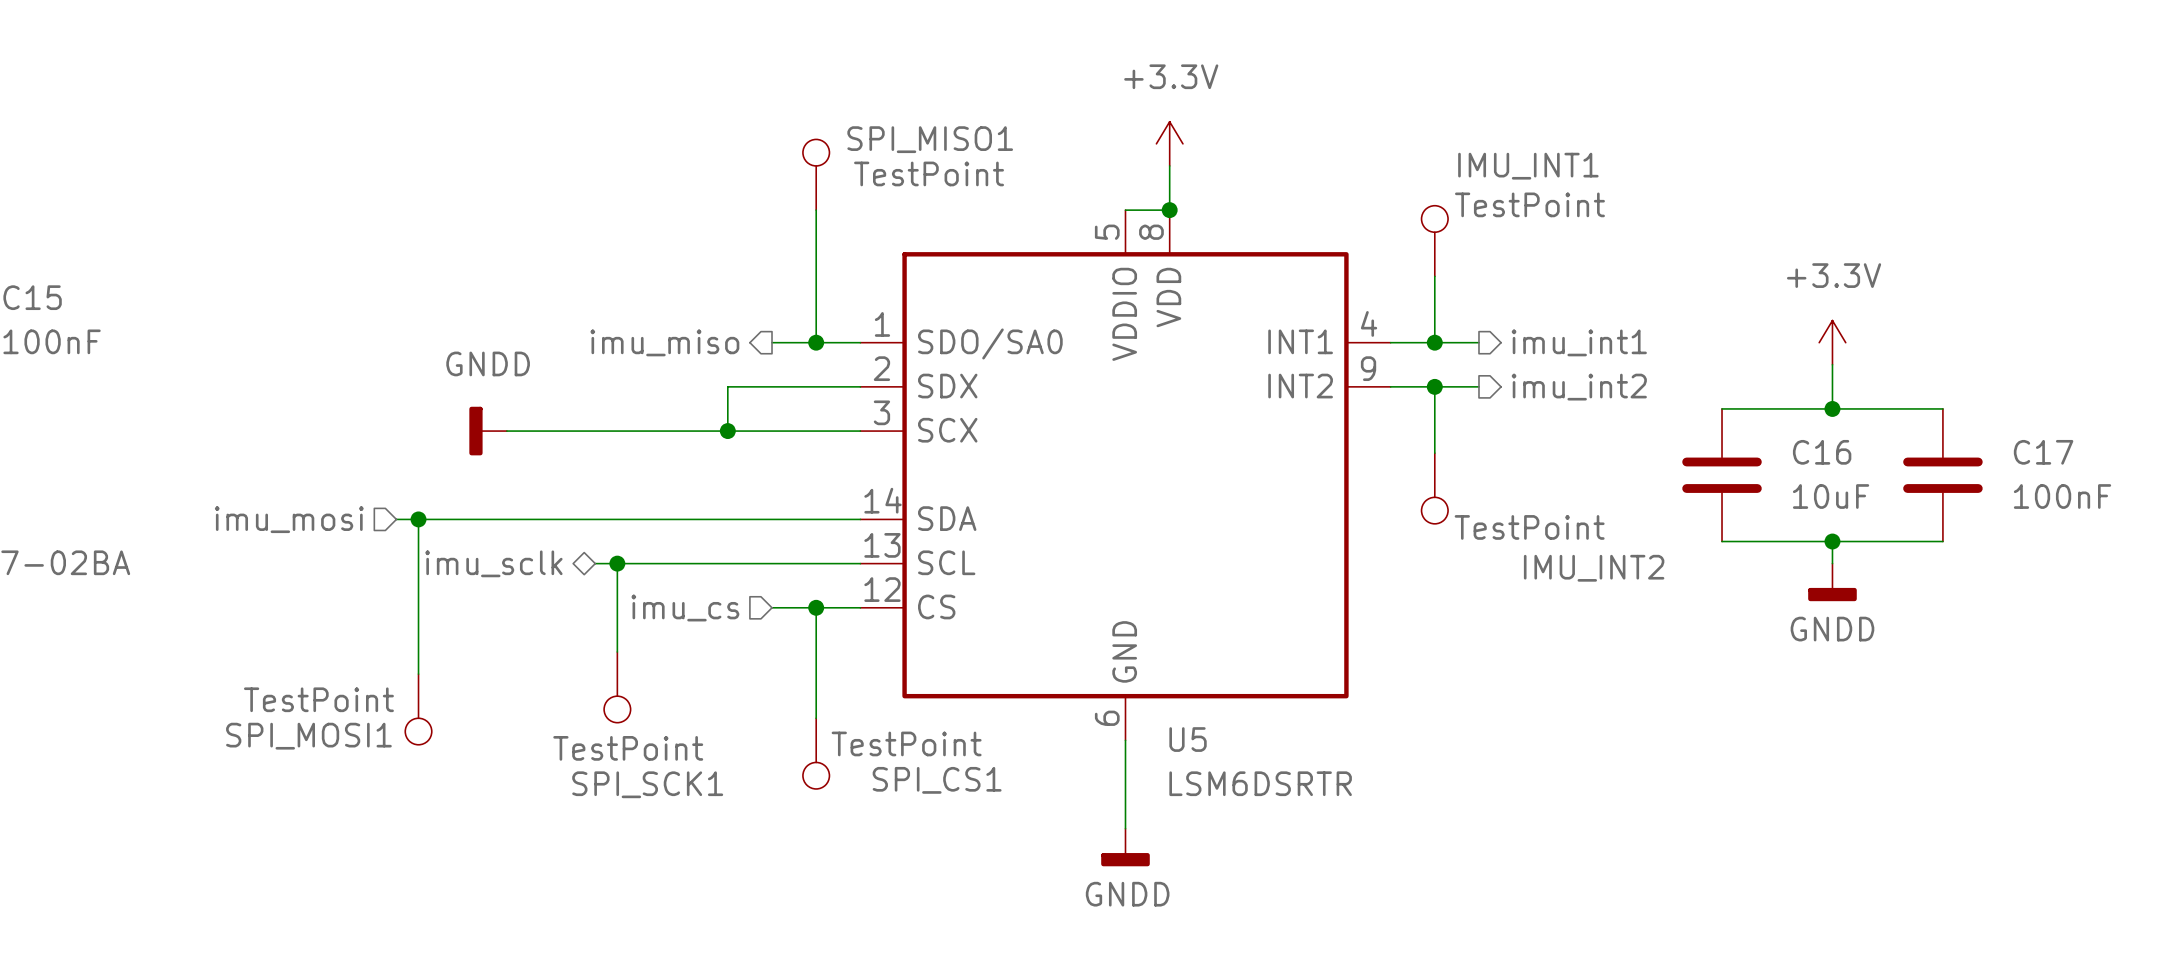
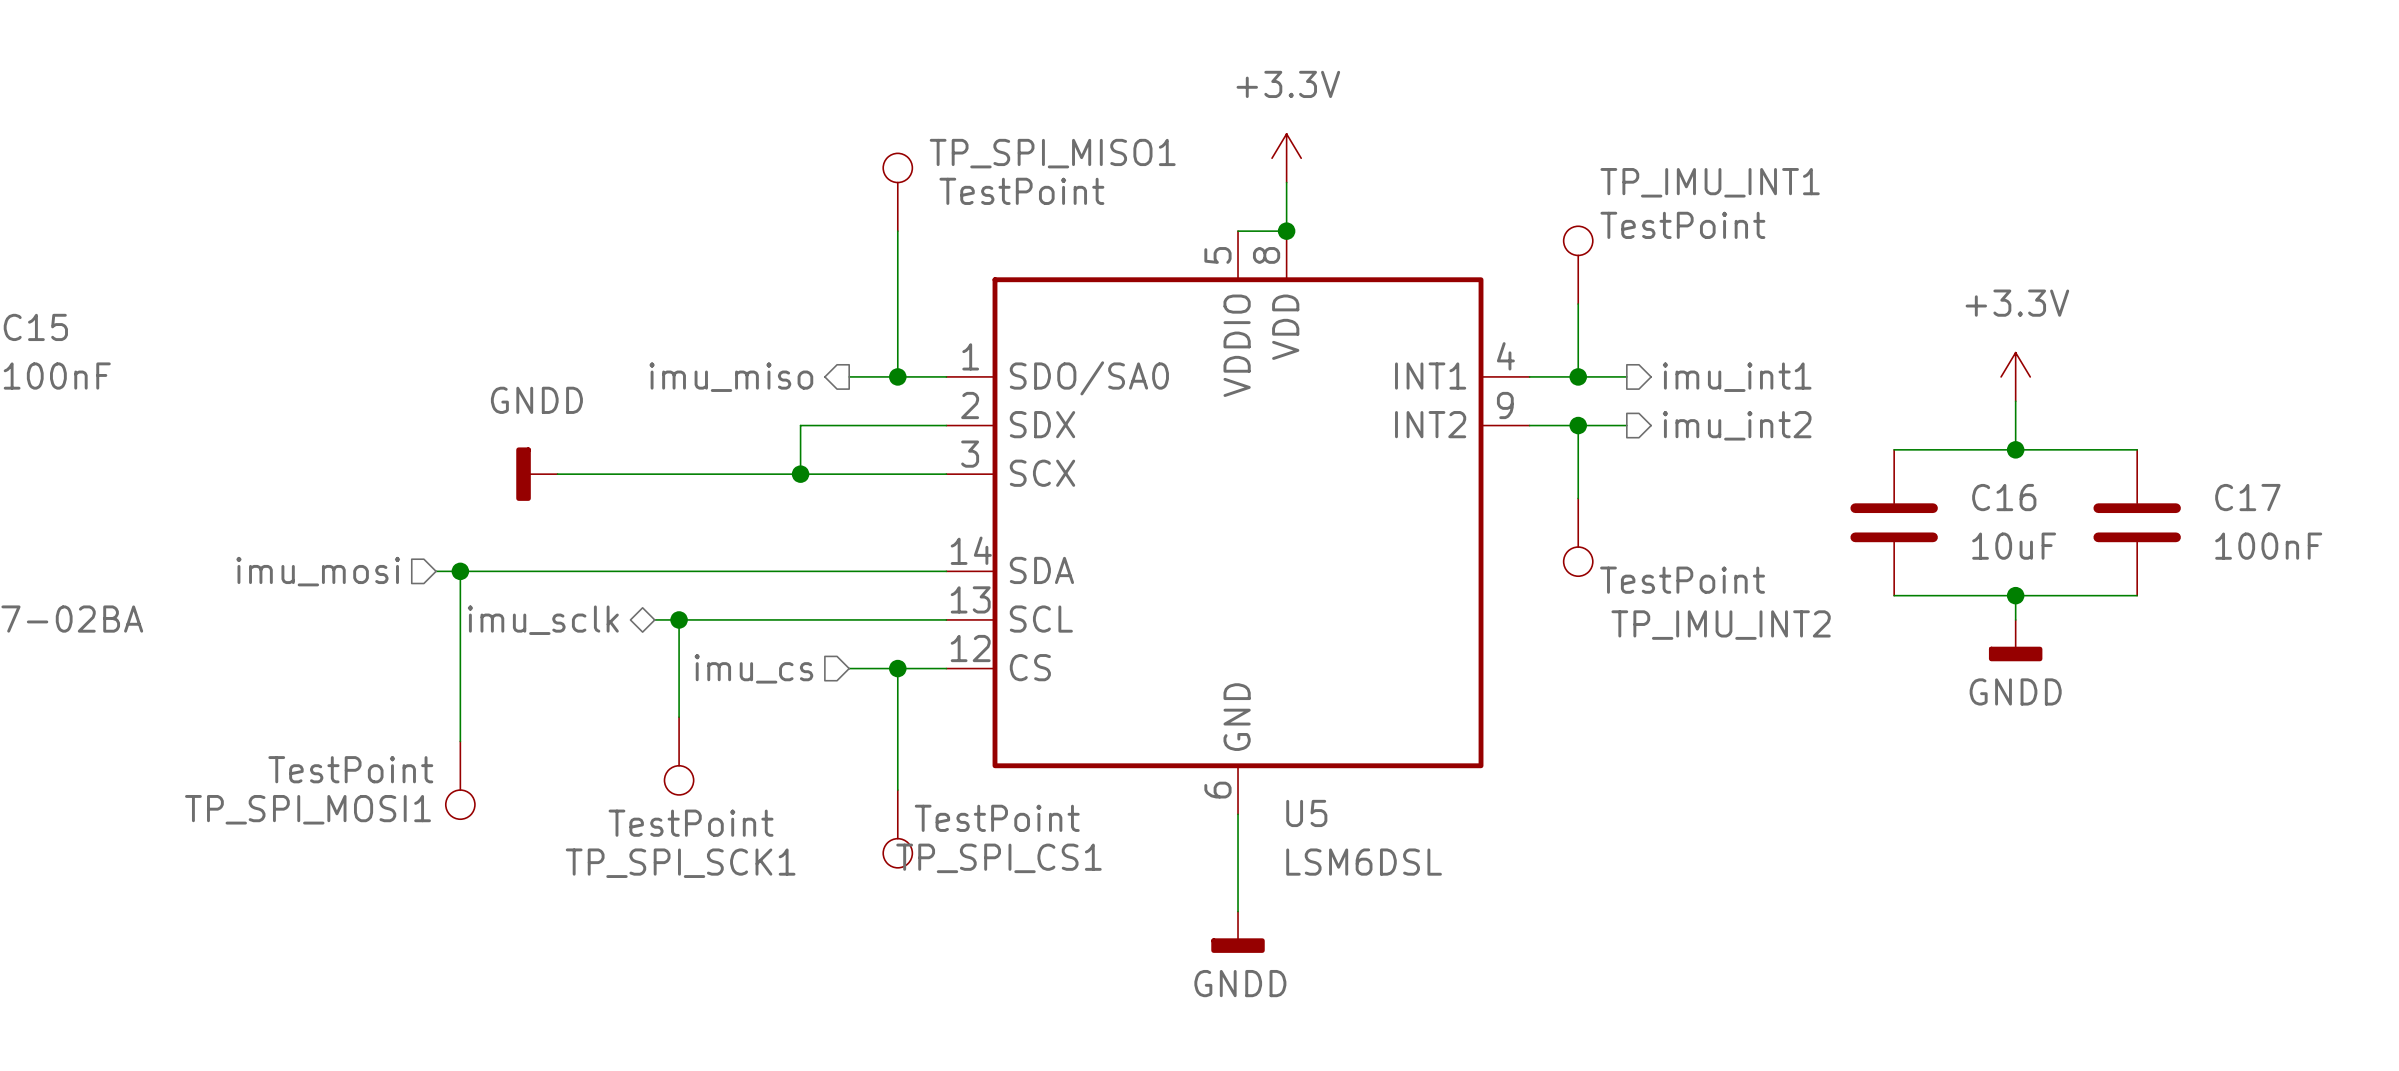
SPI_MISO1 name: SPI_MISO1 (930, 139) -> TP_SPI_MISO1 (1052, 153)
IMU_INT1 name: IMU_INT1 (1528, 166) -> TP_IMU_INT1 (1710, 182)
IMU_INT2 name: IMU_INT2 (1594, 568) -> TP_IMU_INT2 (1721, 625)
SPI_MOSI1 name: SPI_MOSI1 (308, 736) -> TP_SPI_MOSI1 (308, 809)
SPI_CS1 name: SPI_CS1 (937, 780) -> TP_SPI_CS1 (998, 858)
U5 value: LSM6DSRTR (1260, 783) -> LSM6DSL (1364, 862)
SPI_SCK1 name: SPI_SCK1 (647, 784) -> TP_SPI_SCK1 (680, 863)

